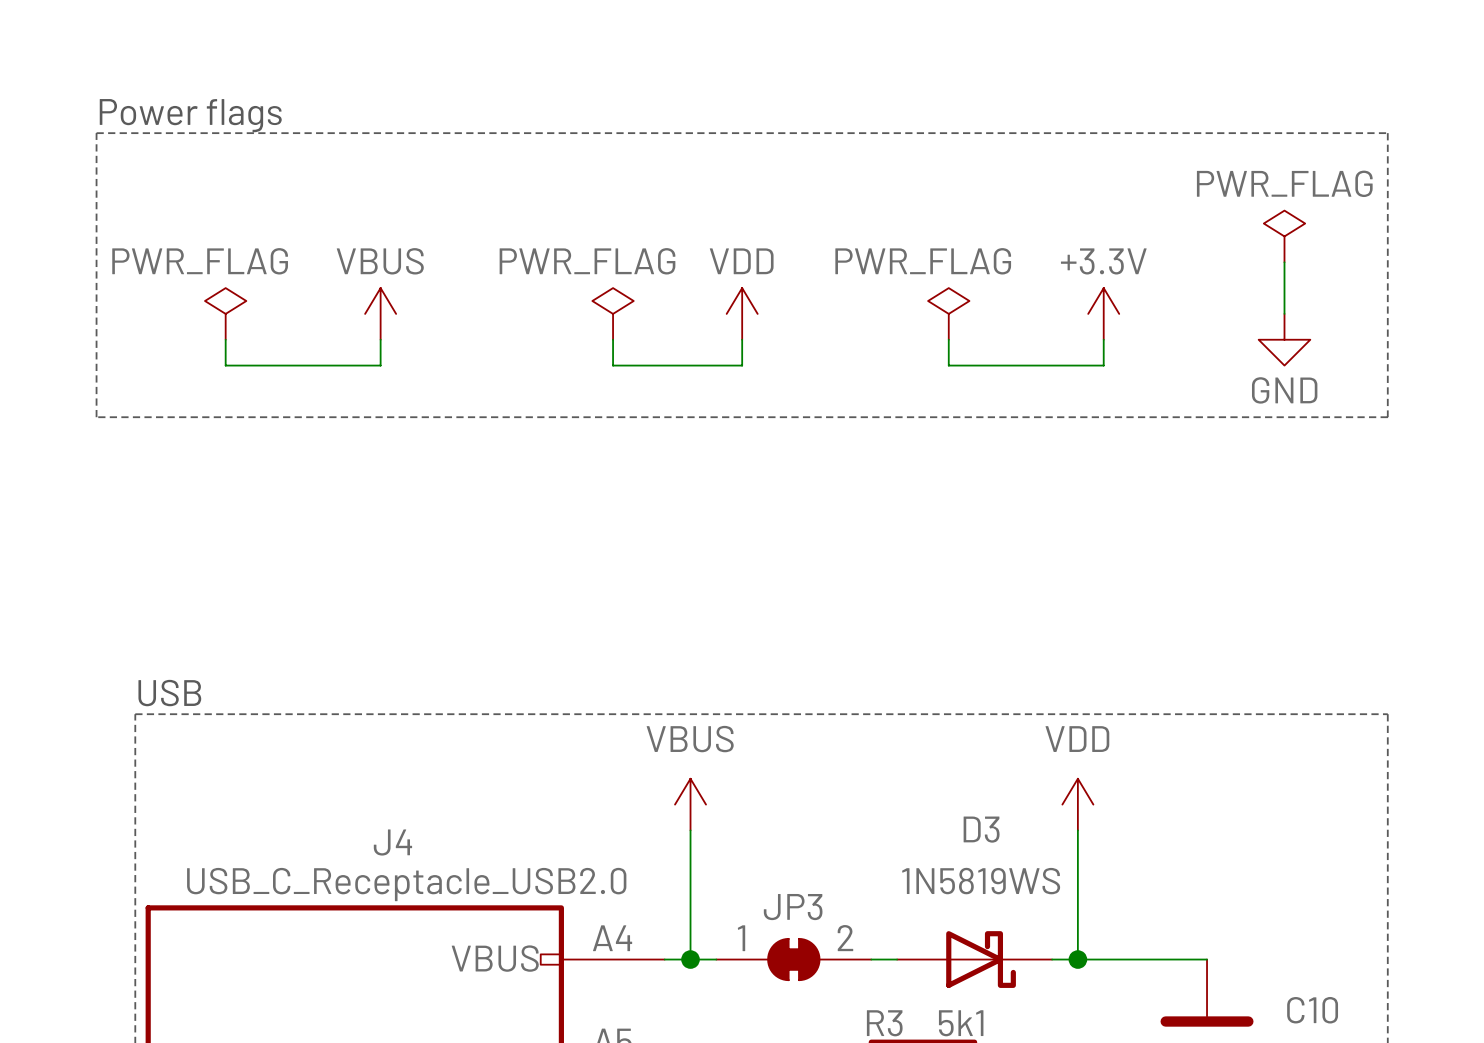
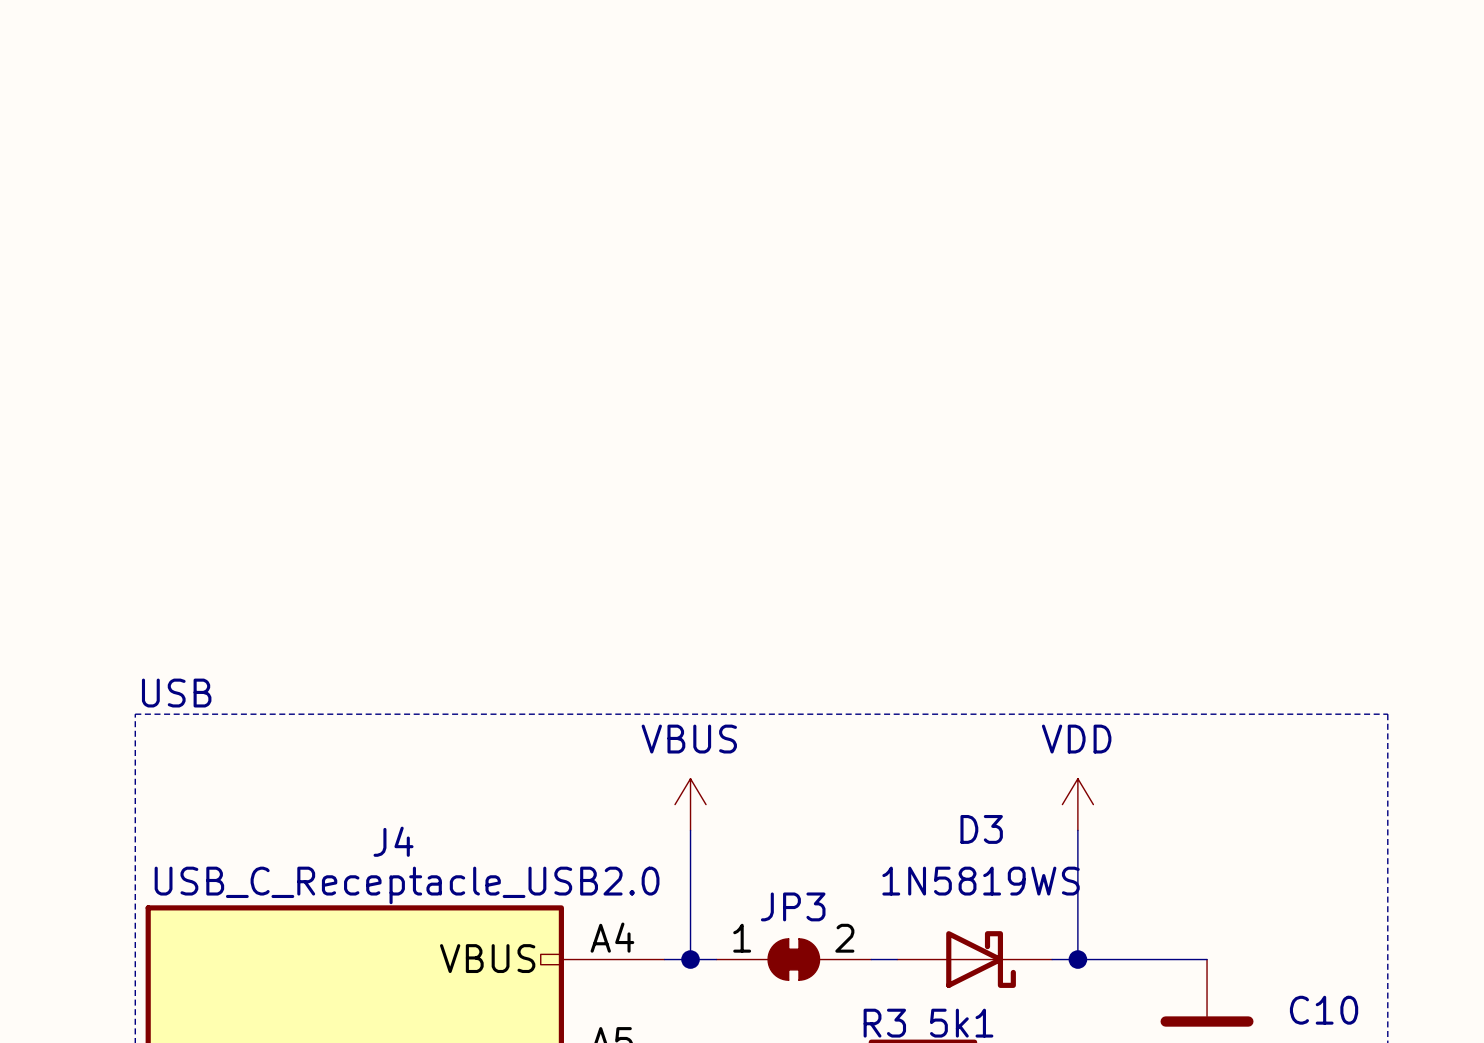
text: Power flags (190, 115) -> none
line: (96, 133) (1387, 133) (1387, 417) (96, 417) (96, 133) -> none
power symbol: PWR_FLAG (1284, 236) -> none
wire: (1284, 262) (1284, 313) -> none
power symbol: PWR_FLAG (225, 313) -> none
power symbol: VBUS (380, 313) -> none
power symbol: PWR_FLAG (613, 313) -> none
power symbol: VDD (742, 313) -> none
power symbol: PWR_FLAG (948, 313) -> none
power symbol: +3.3V (1103, 313) -> none
wire: (225, 339) (225, 365) (380, 365) (380, 339) -> none
wire: (613, 339) (613, 365) (742, 365) (742, 339) -> none
wire: (948, 339) (948, 365) (1103, 365) (1103, 339) -> none
power symbol: GND (1284, 339) -> none

